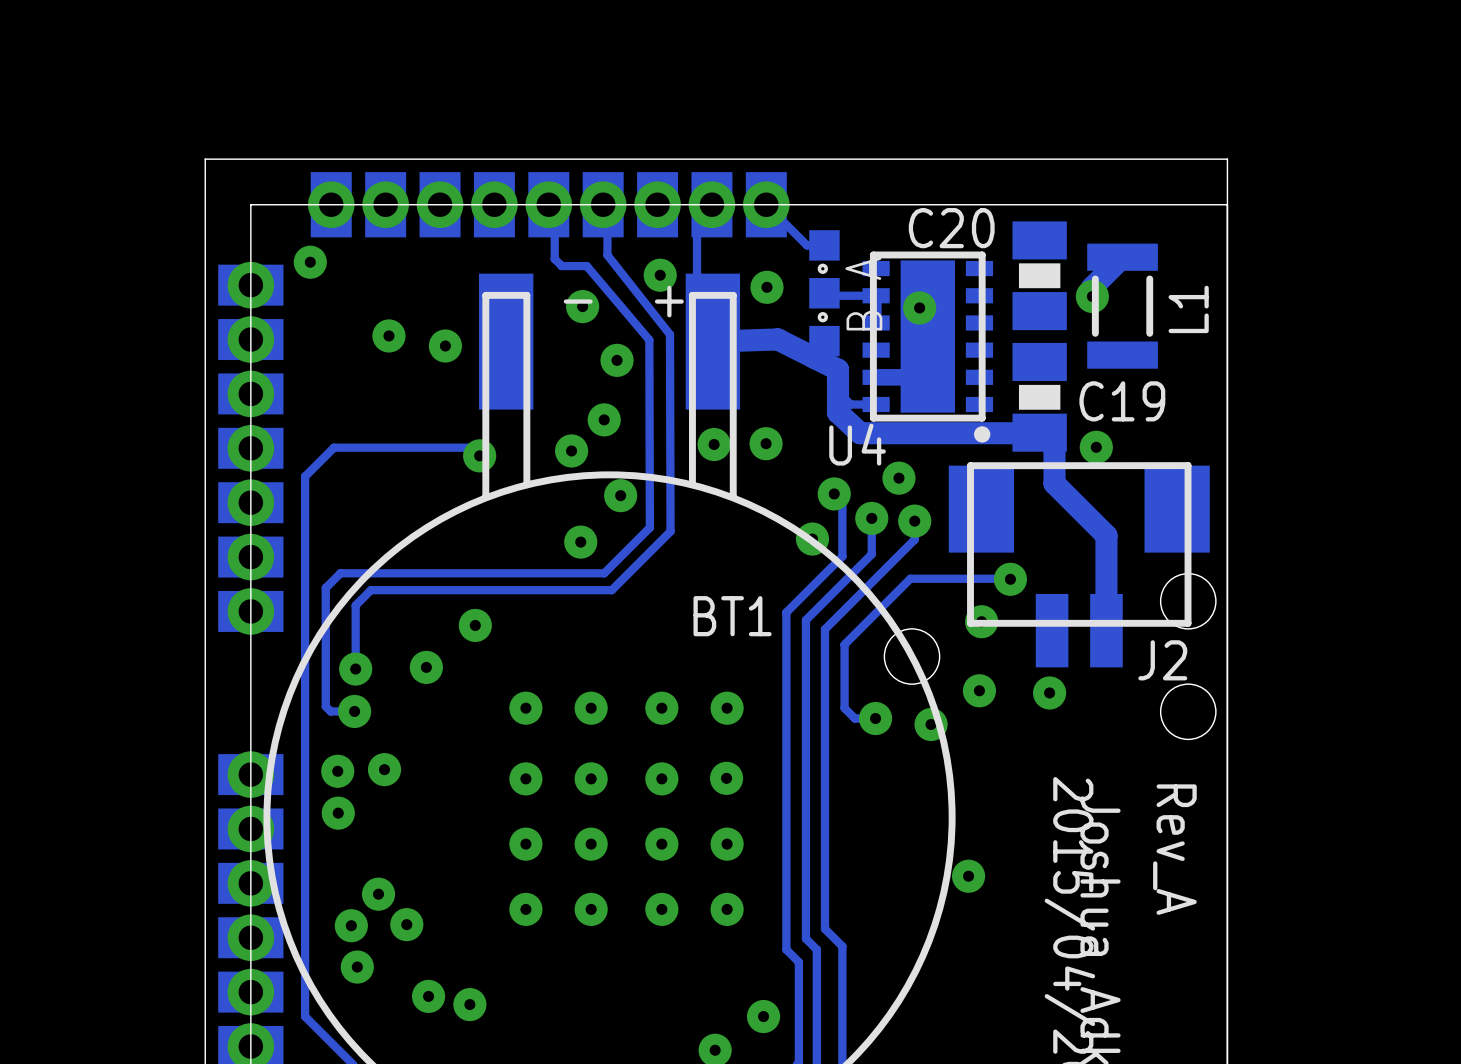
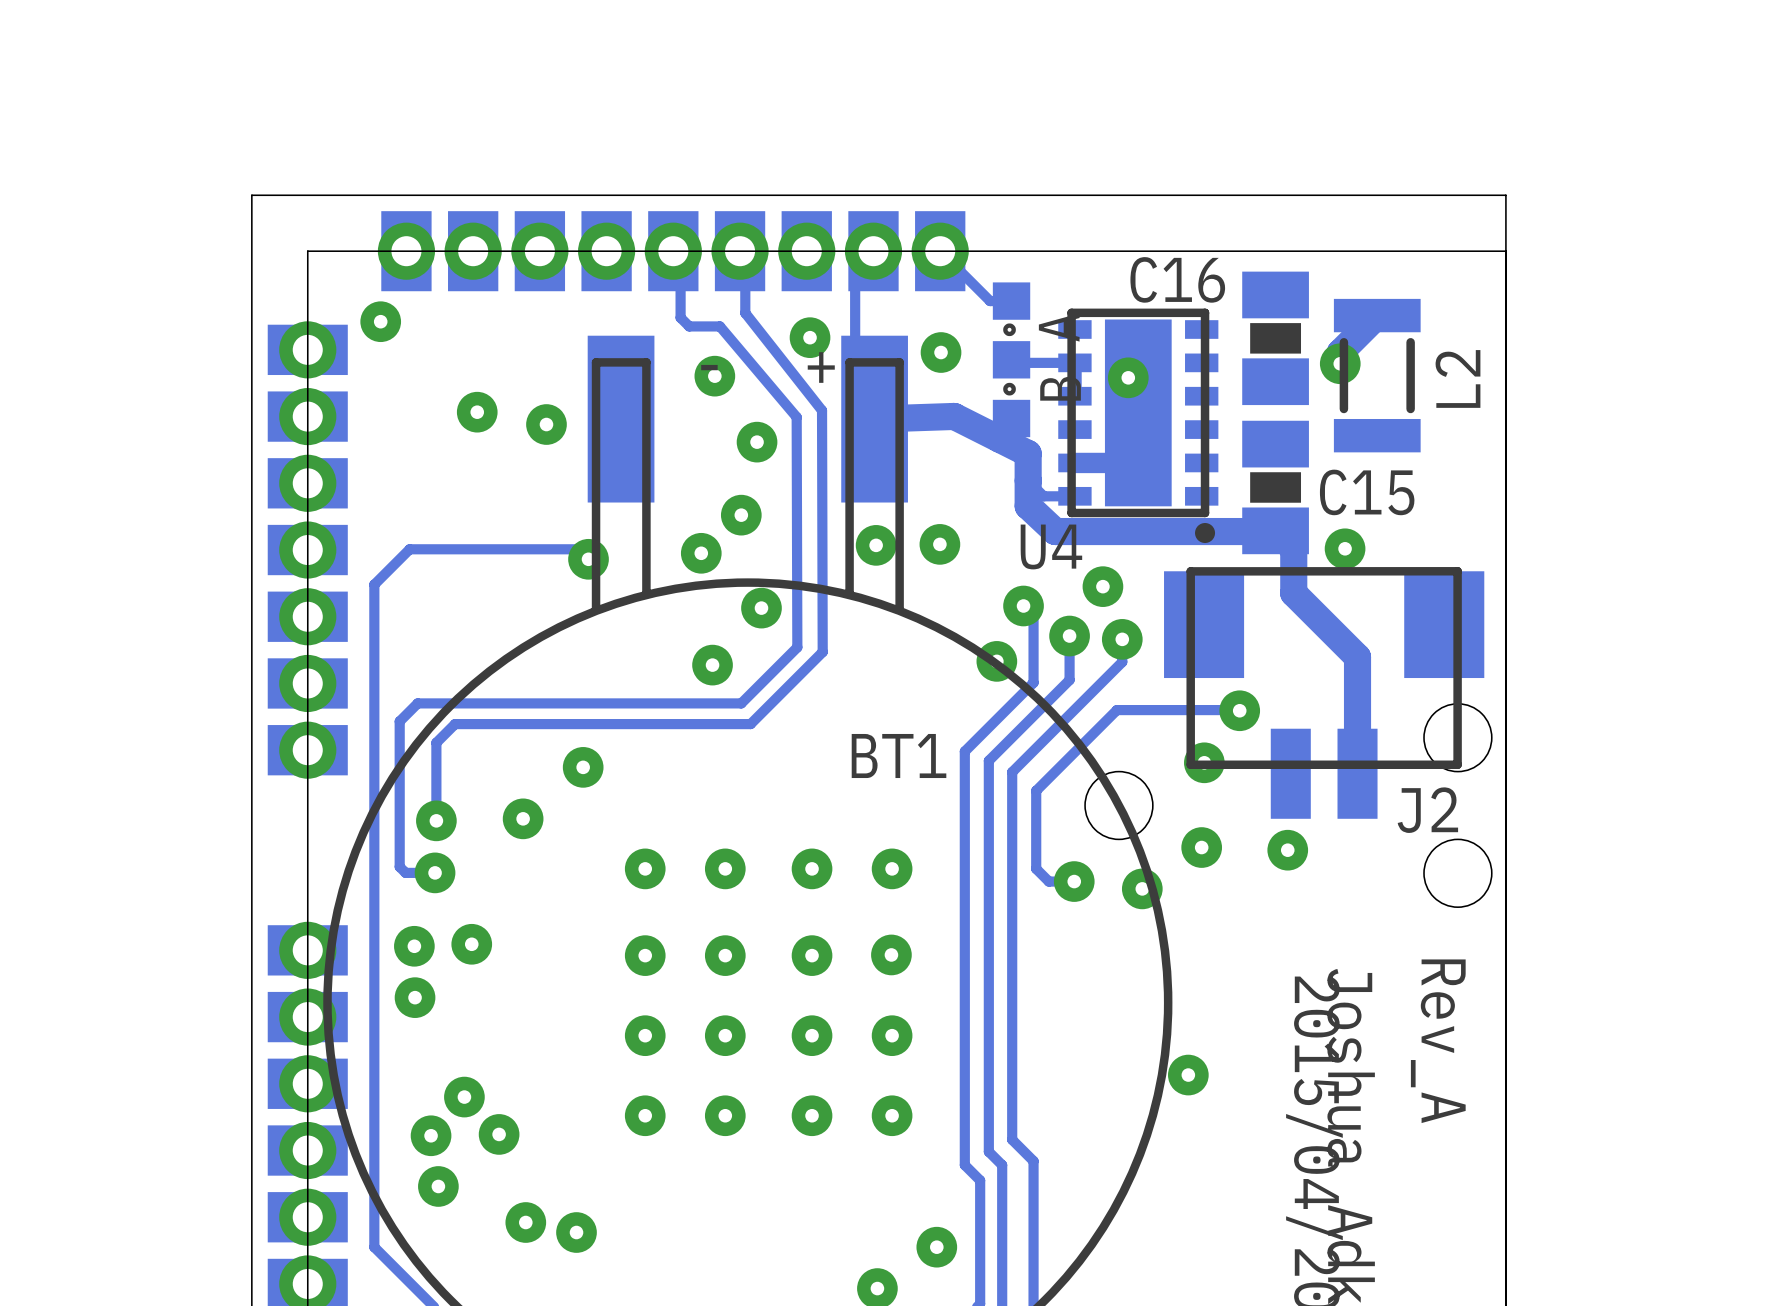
C20 name: C20 (951, 228) -> C16 (1177, 279)
L1 name: L1 (1188, 309) -> L2 (1457, 378)
C19 name: C19 (1122, 401) -> C15 (1367, 492)

